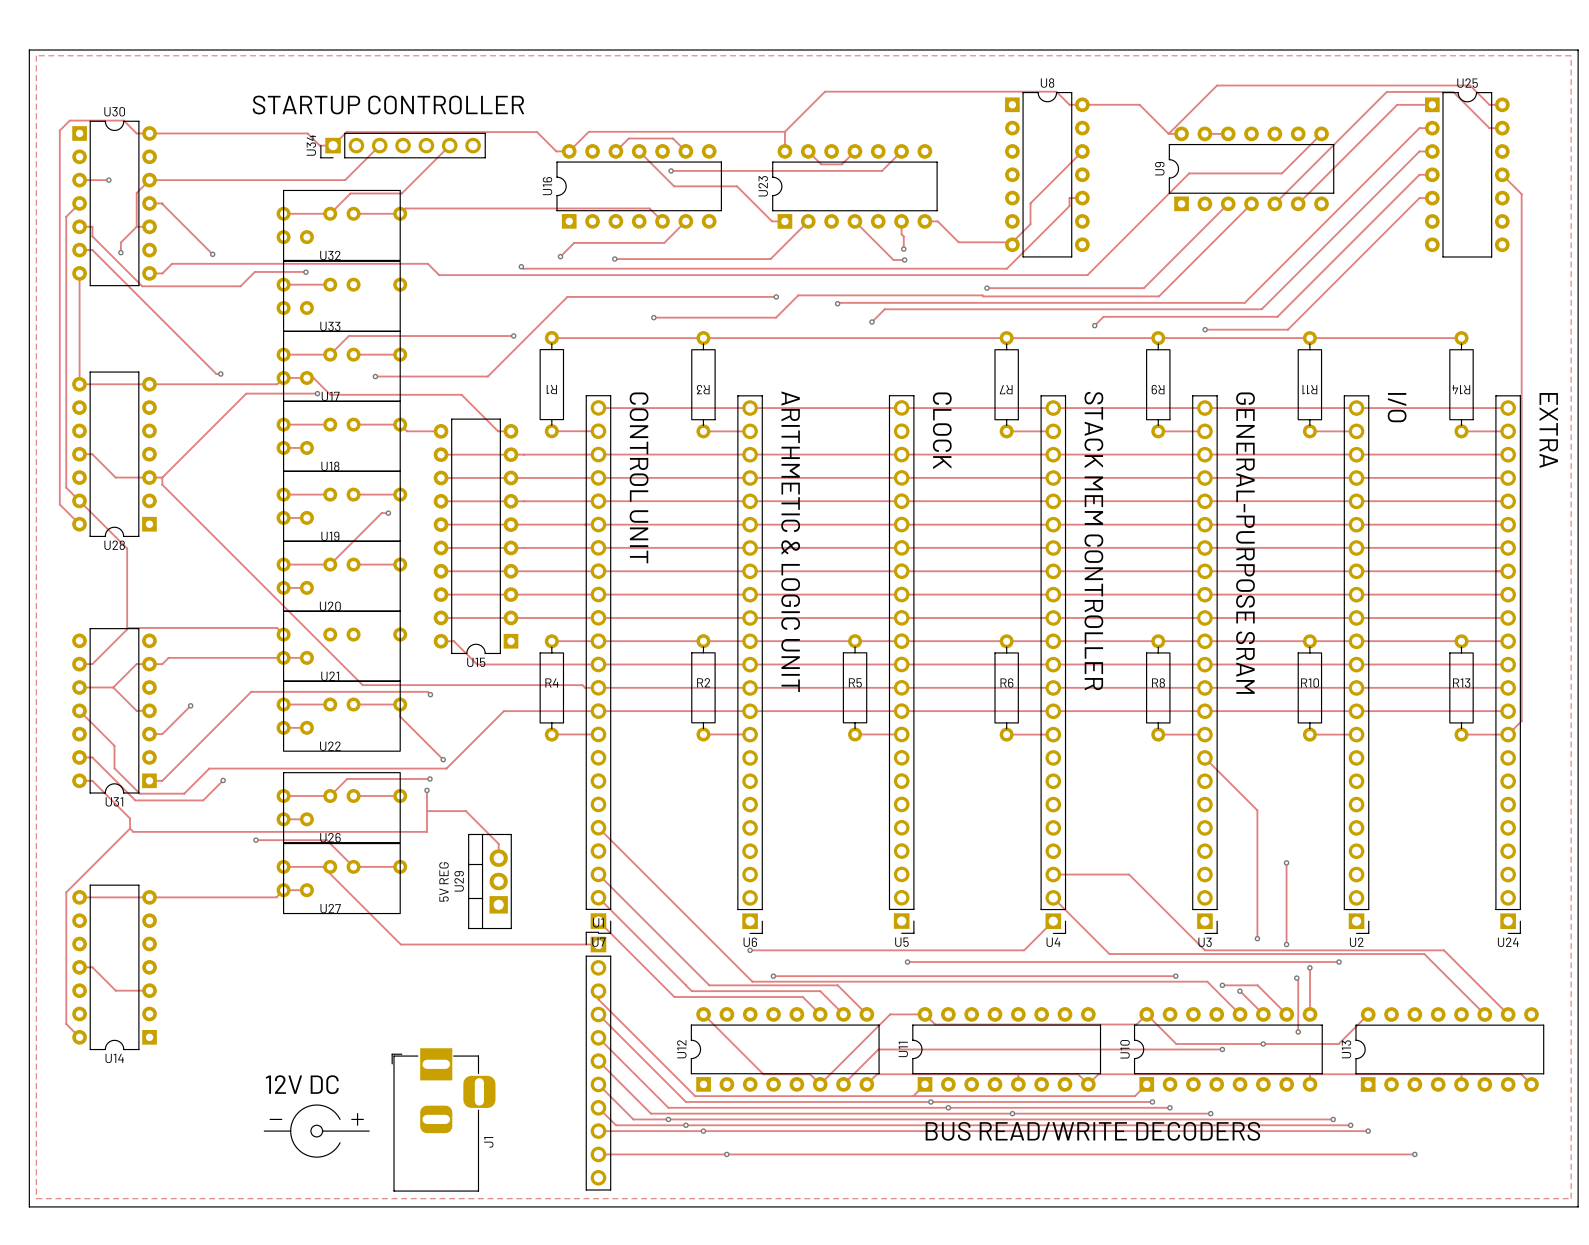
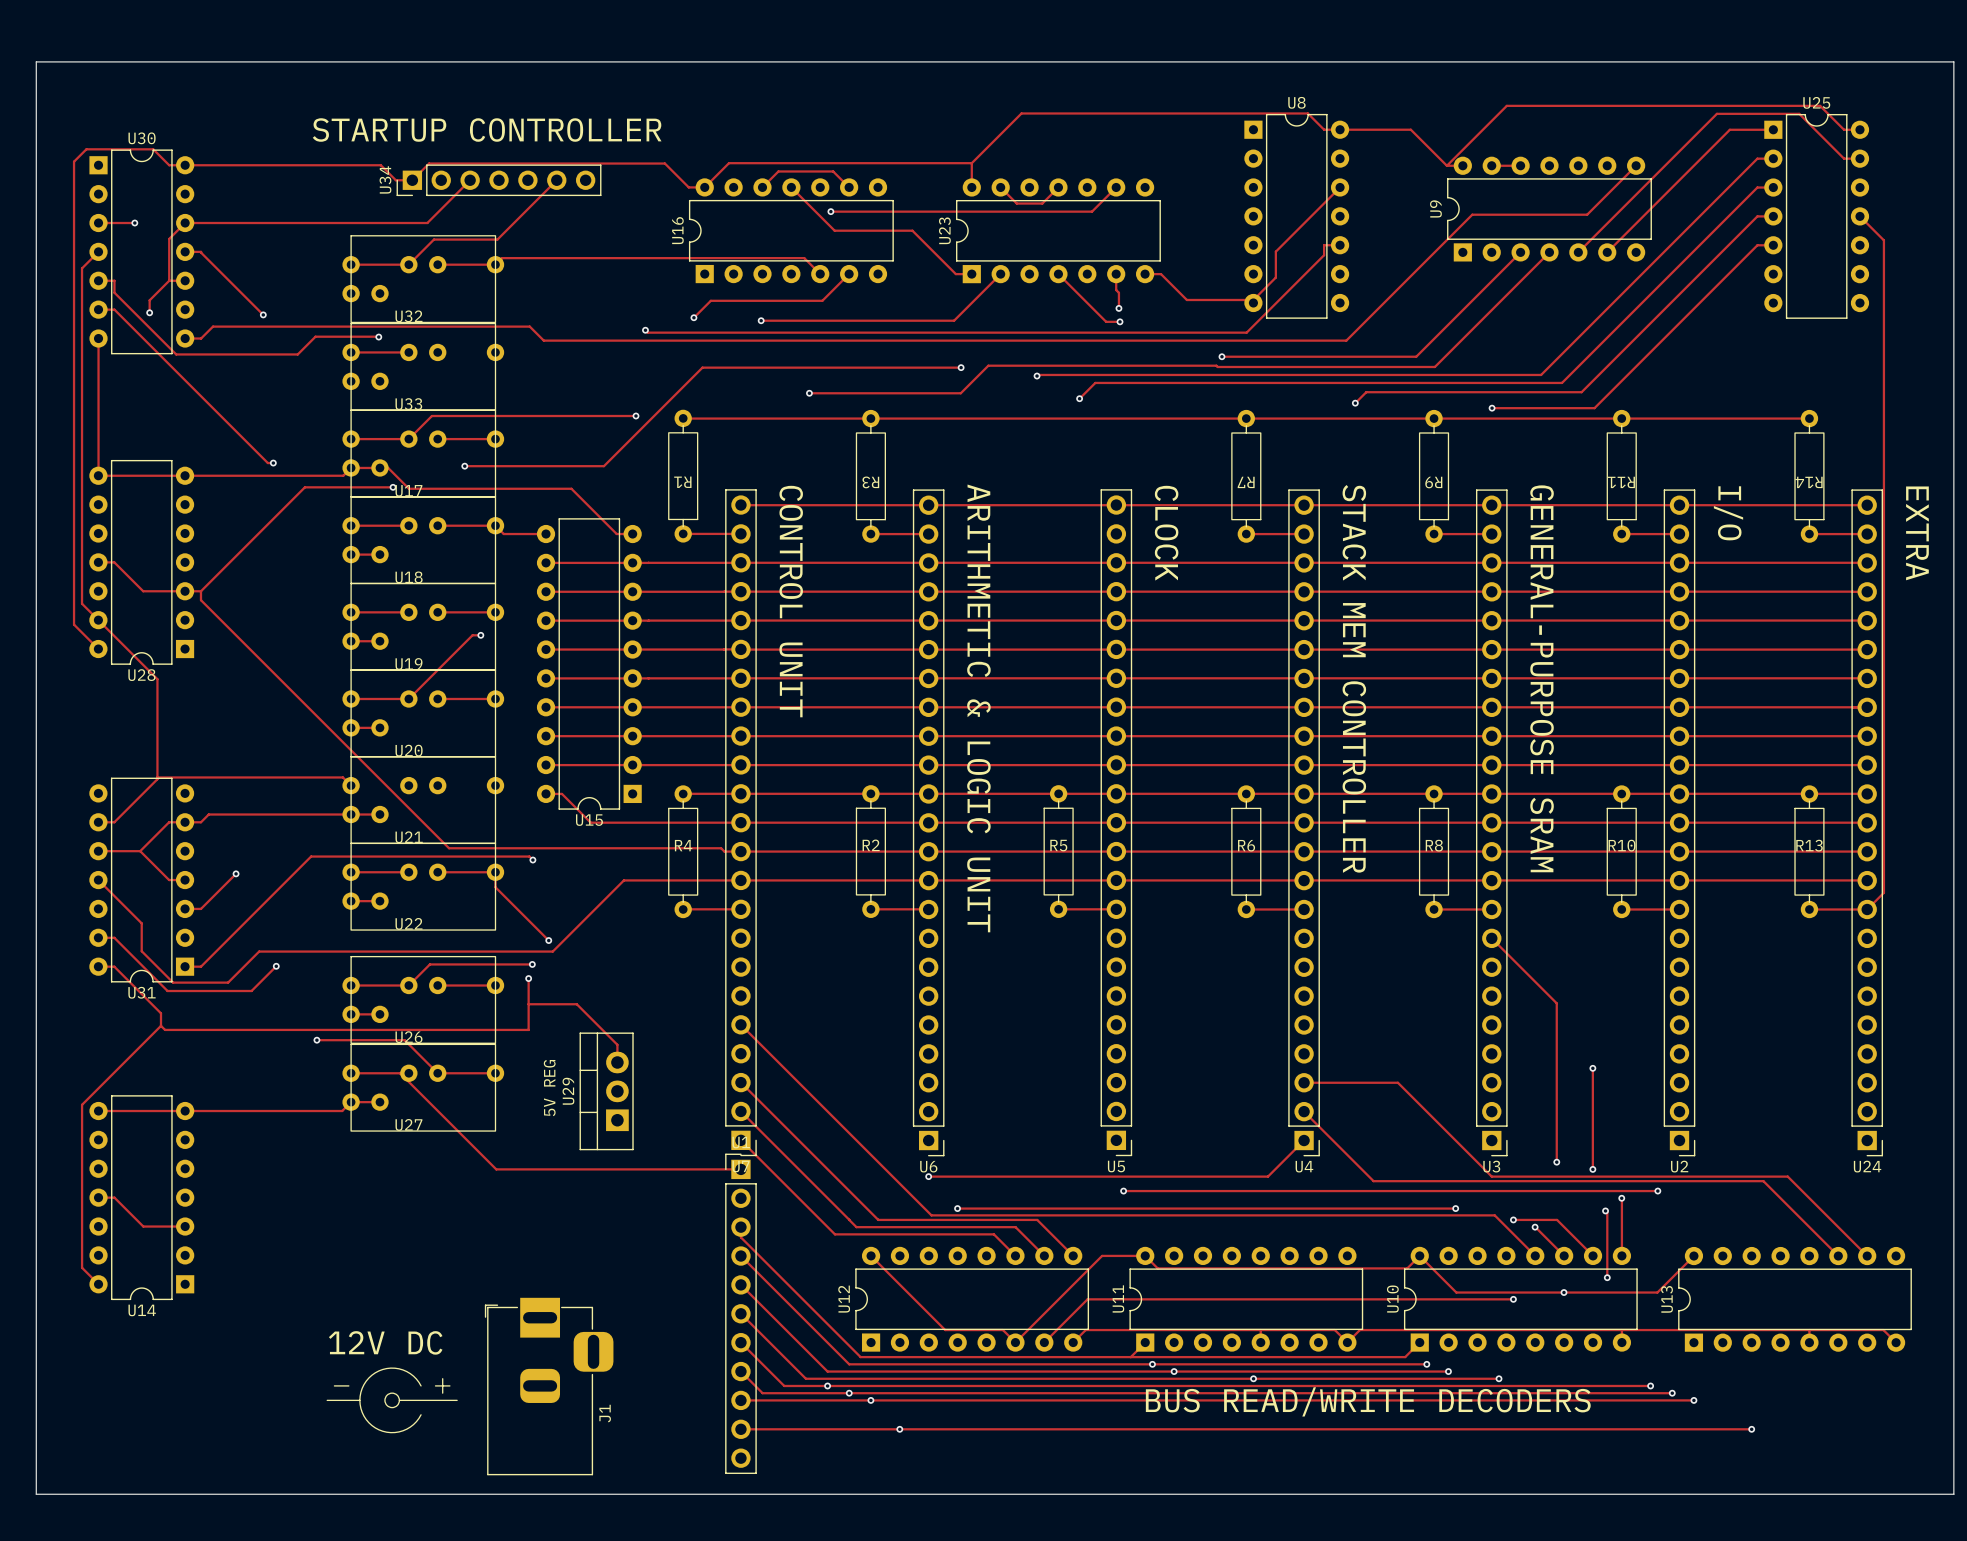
zone outline: (36, 55) (36, 1198) (1571, 1198) (1571, 55) (36, 55) -> none

